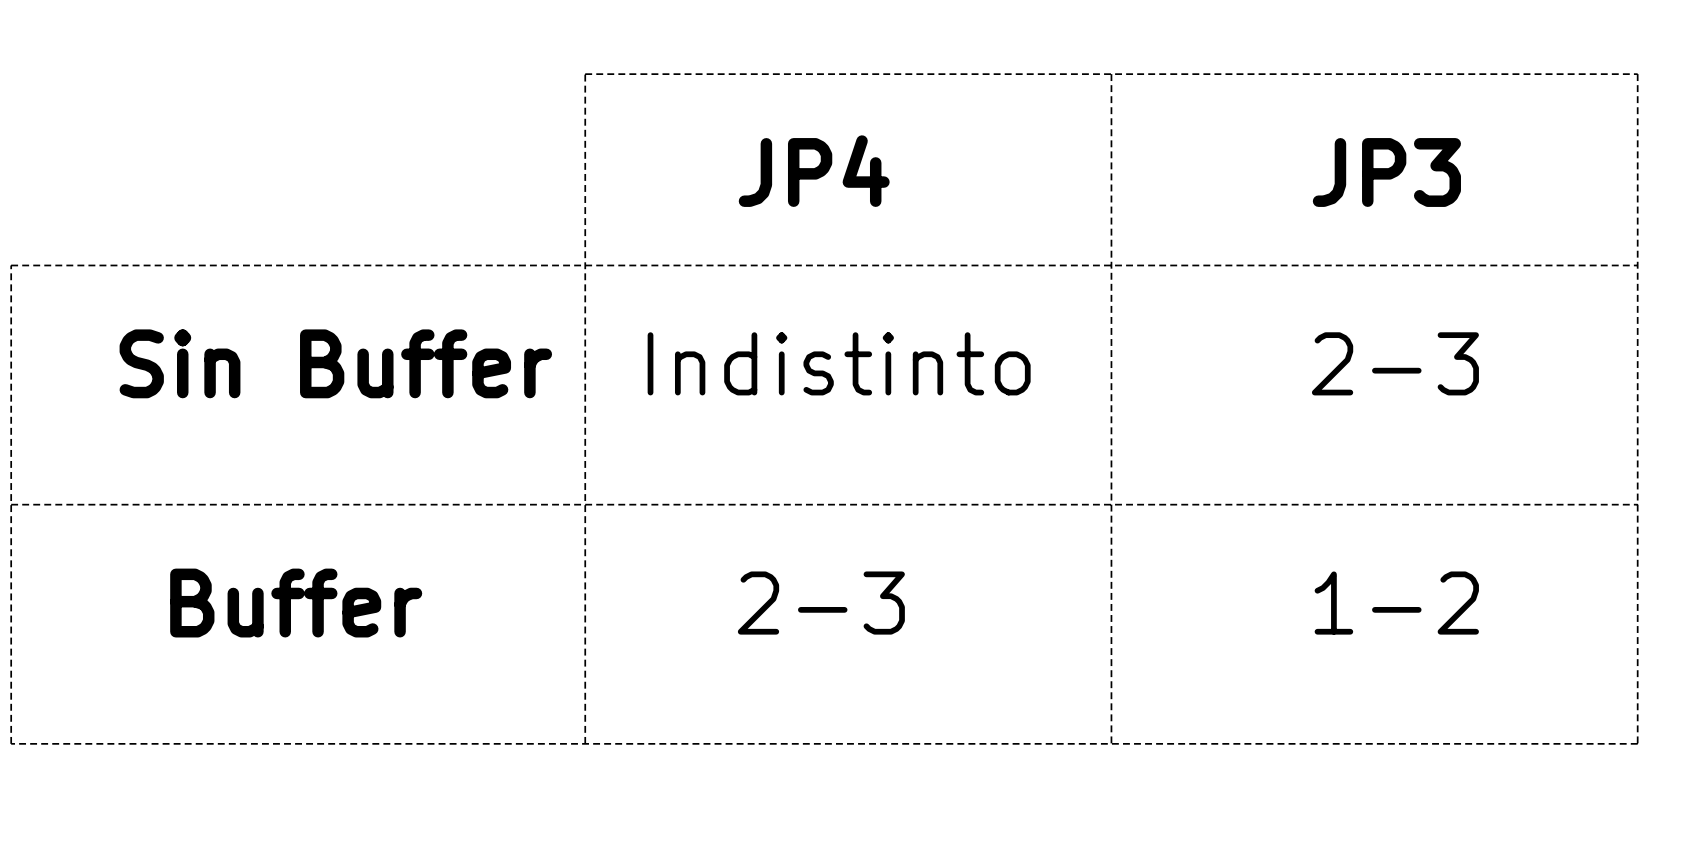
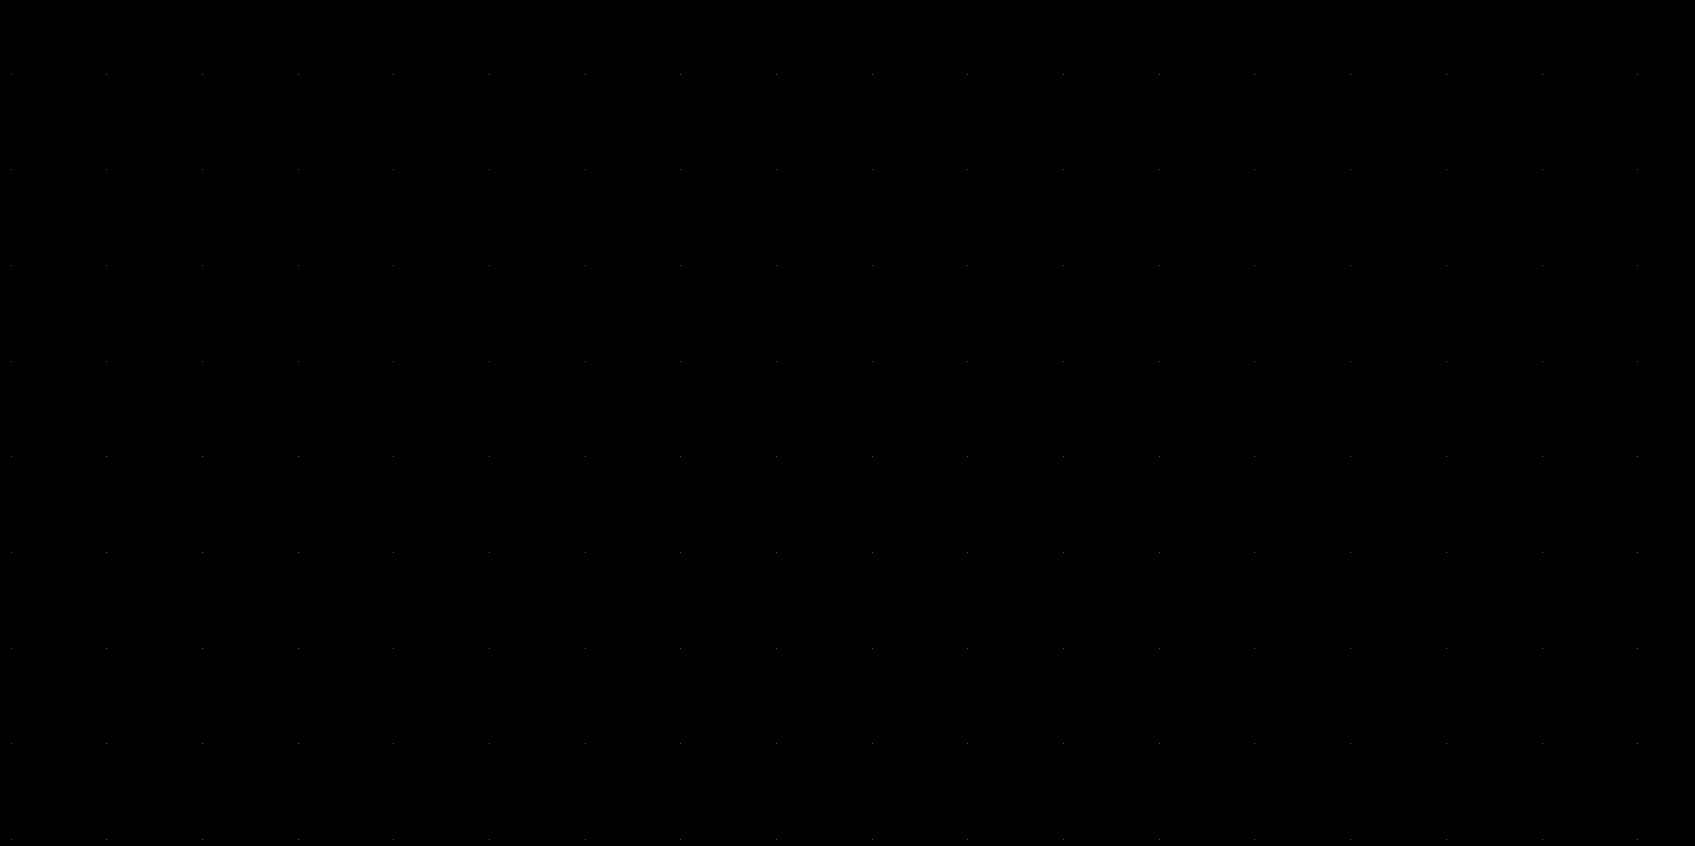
line: (1111, 74) (1111, 743) -> none
text: JP4 (814, 171) -> none
text: JP3 (1386, 172) -> none
line: (1637, 265) (11, 265) (11, 743) (1637, 743) (1637, 74) (585, 74) (585, 743) -> none
text: Sin Buffer (335, 363) -> none
text: Indistinto (839, 363) -> none
text: 2-3 (1395, 363) -> none
line: (11, 504) (1637, 504) -> none
text: Buffer (296, 603) -> none
text: 2-3 (821, 603) -> none
text: 1-2 (1396, 603) -> none

